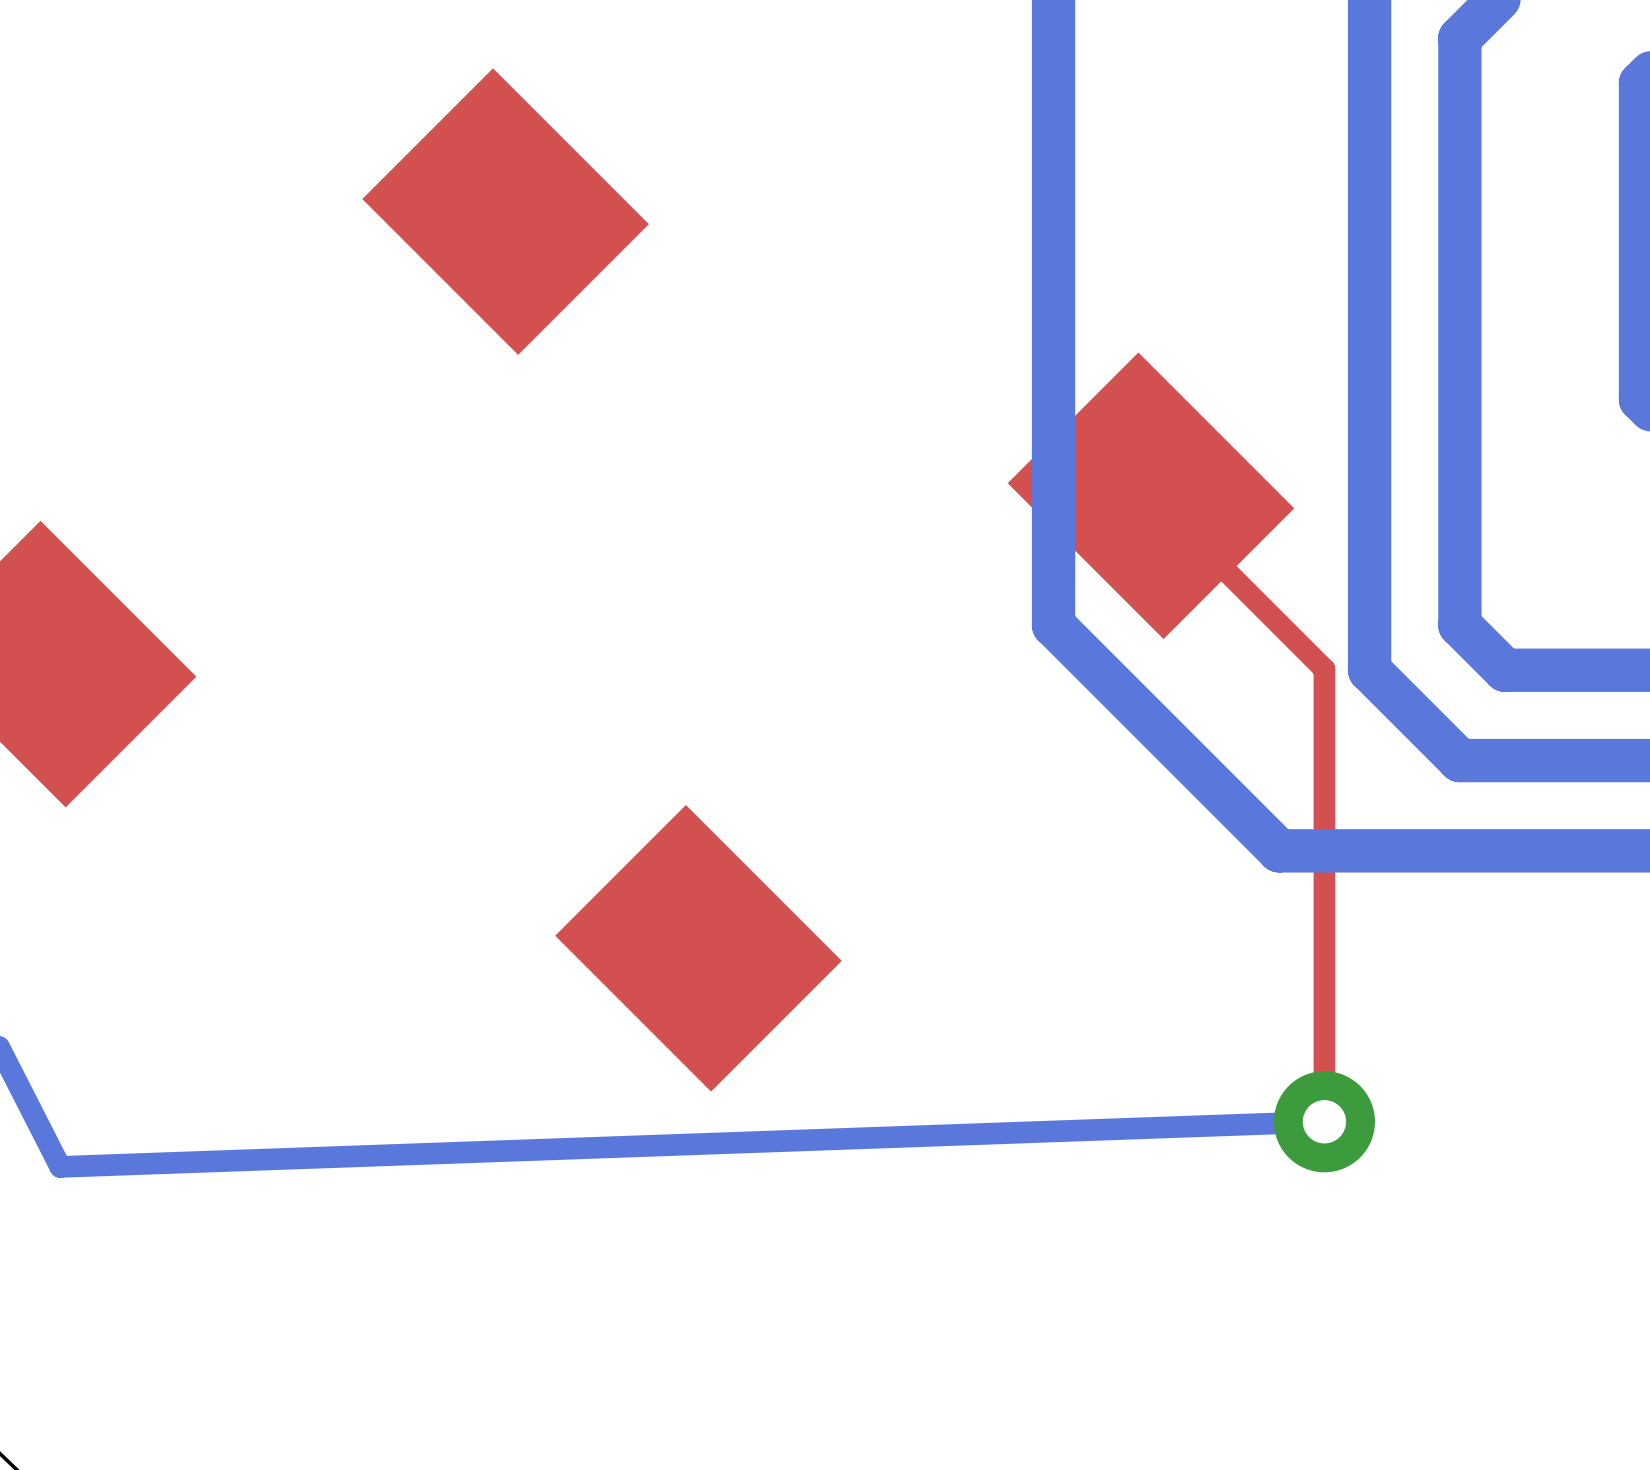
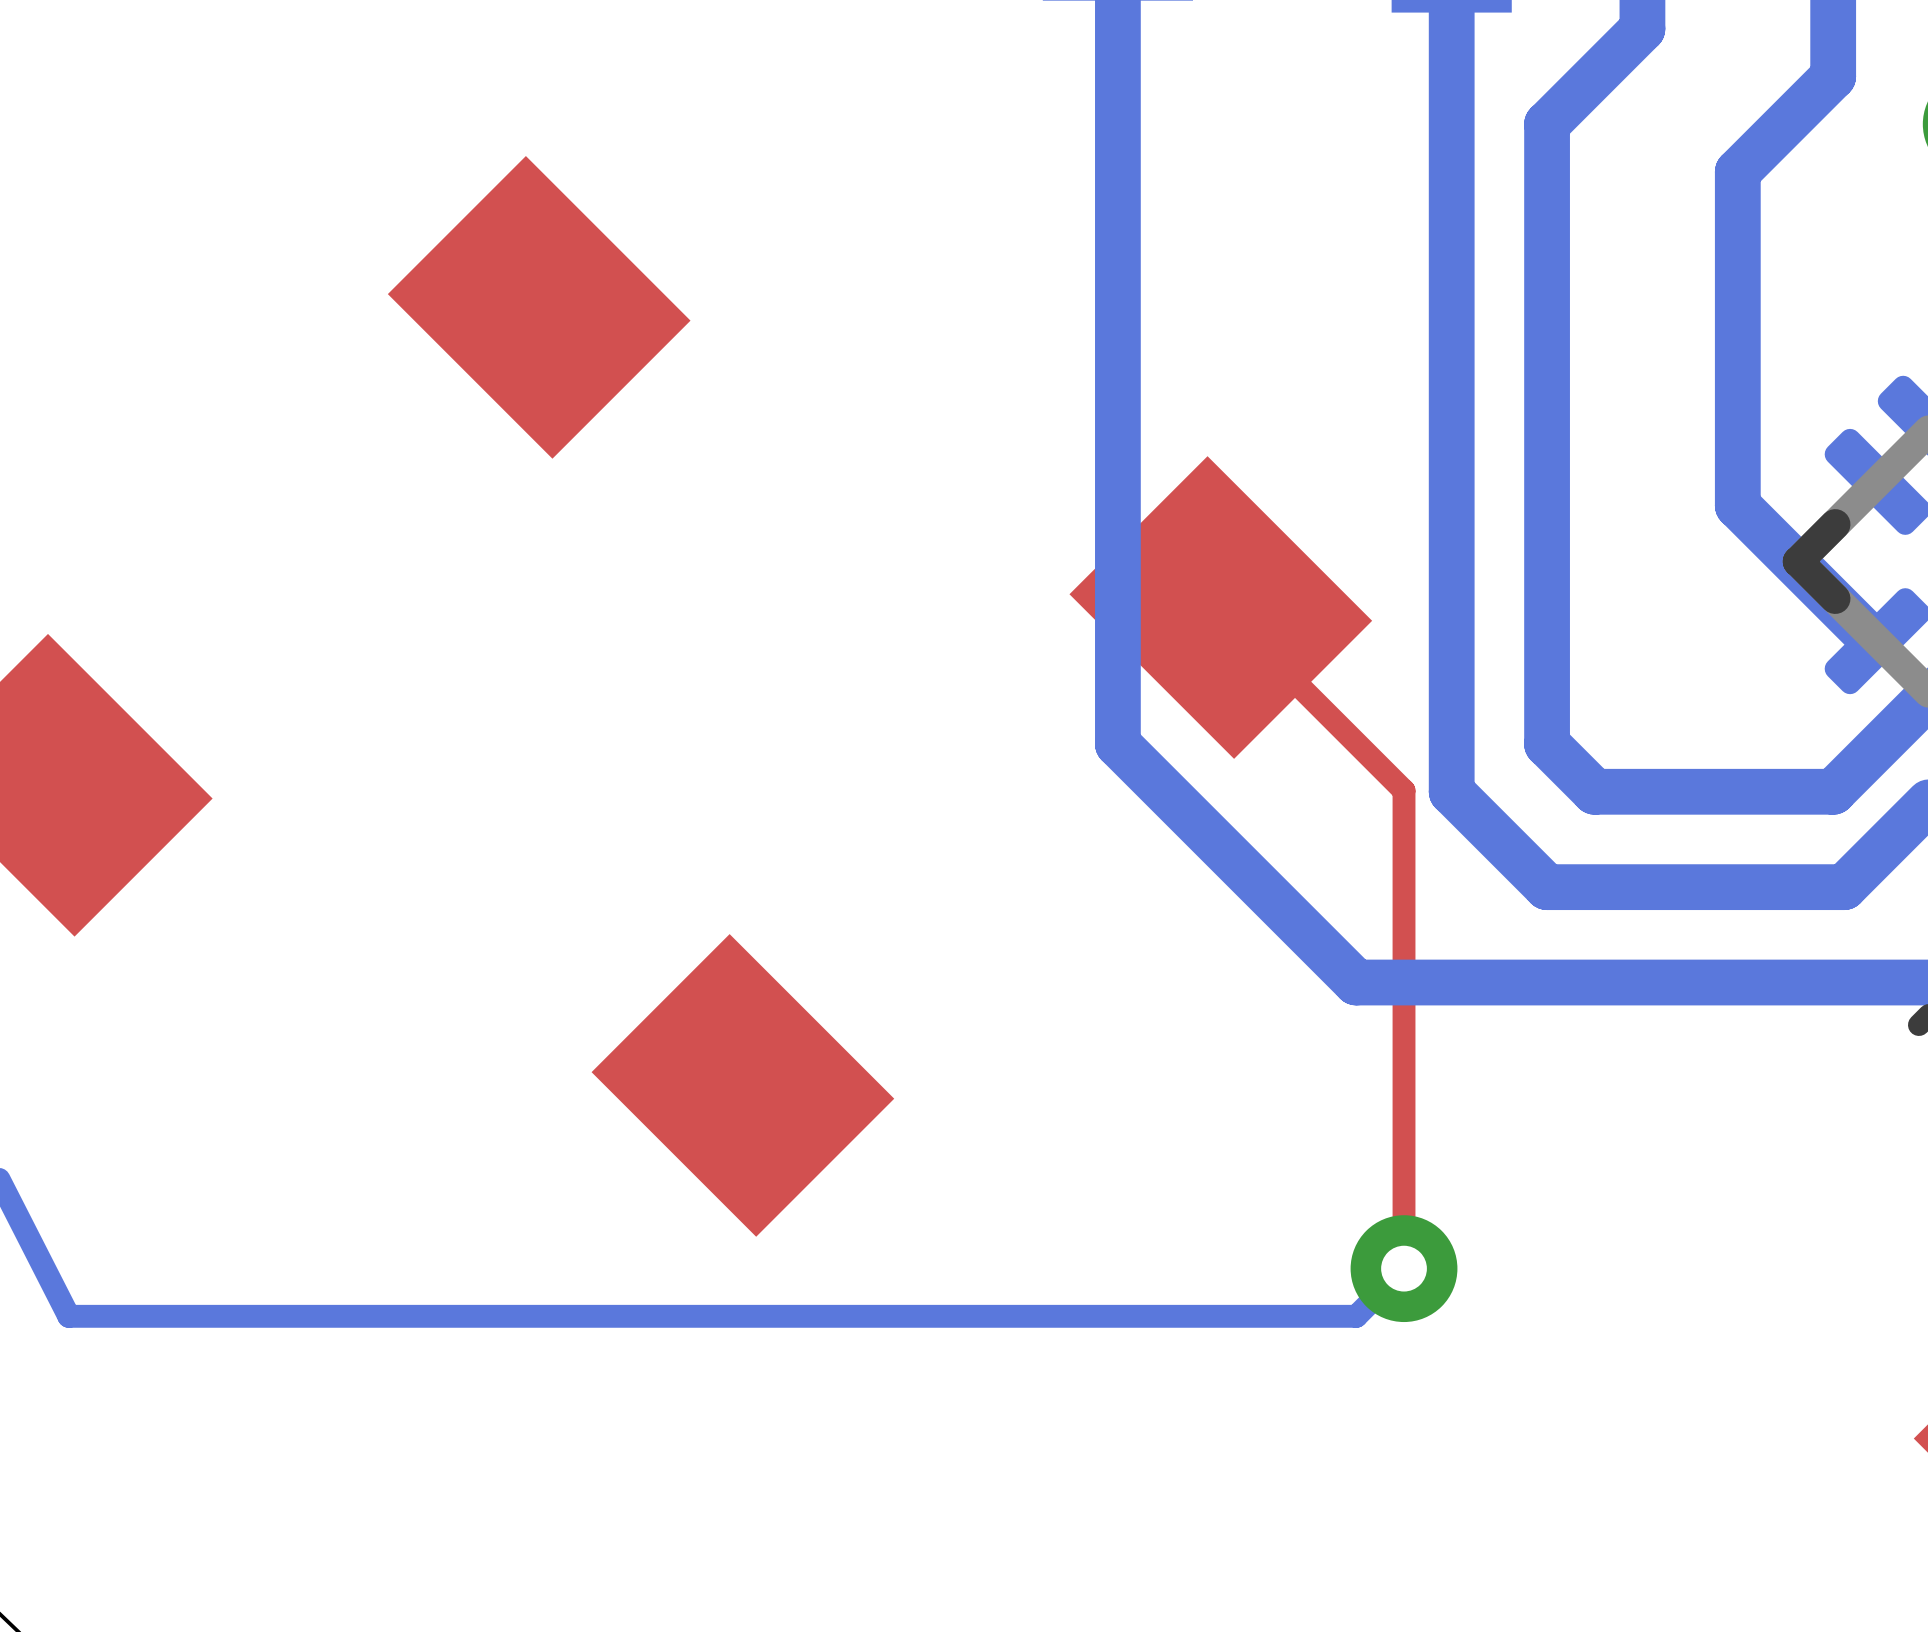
bottom track: (1324, 1121) (60, 1166) -> (1404, 1268) (1356, 1316) (68, 1316)

